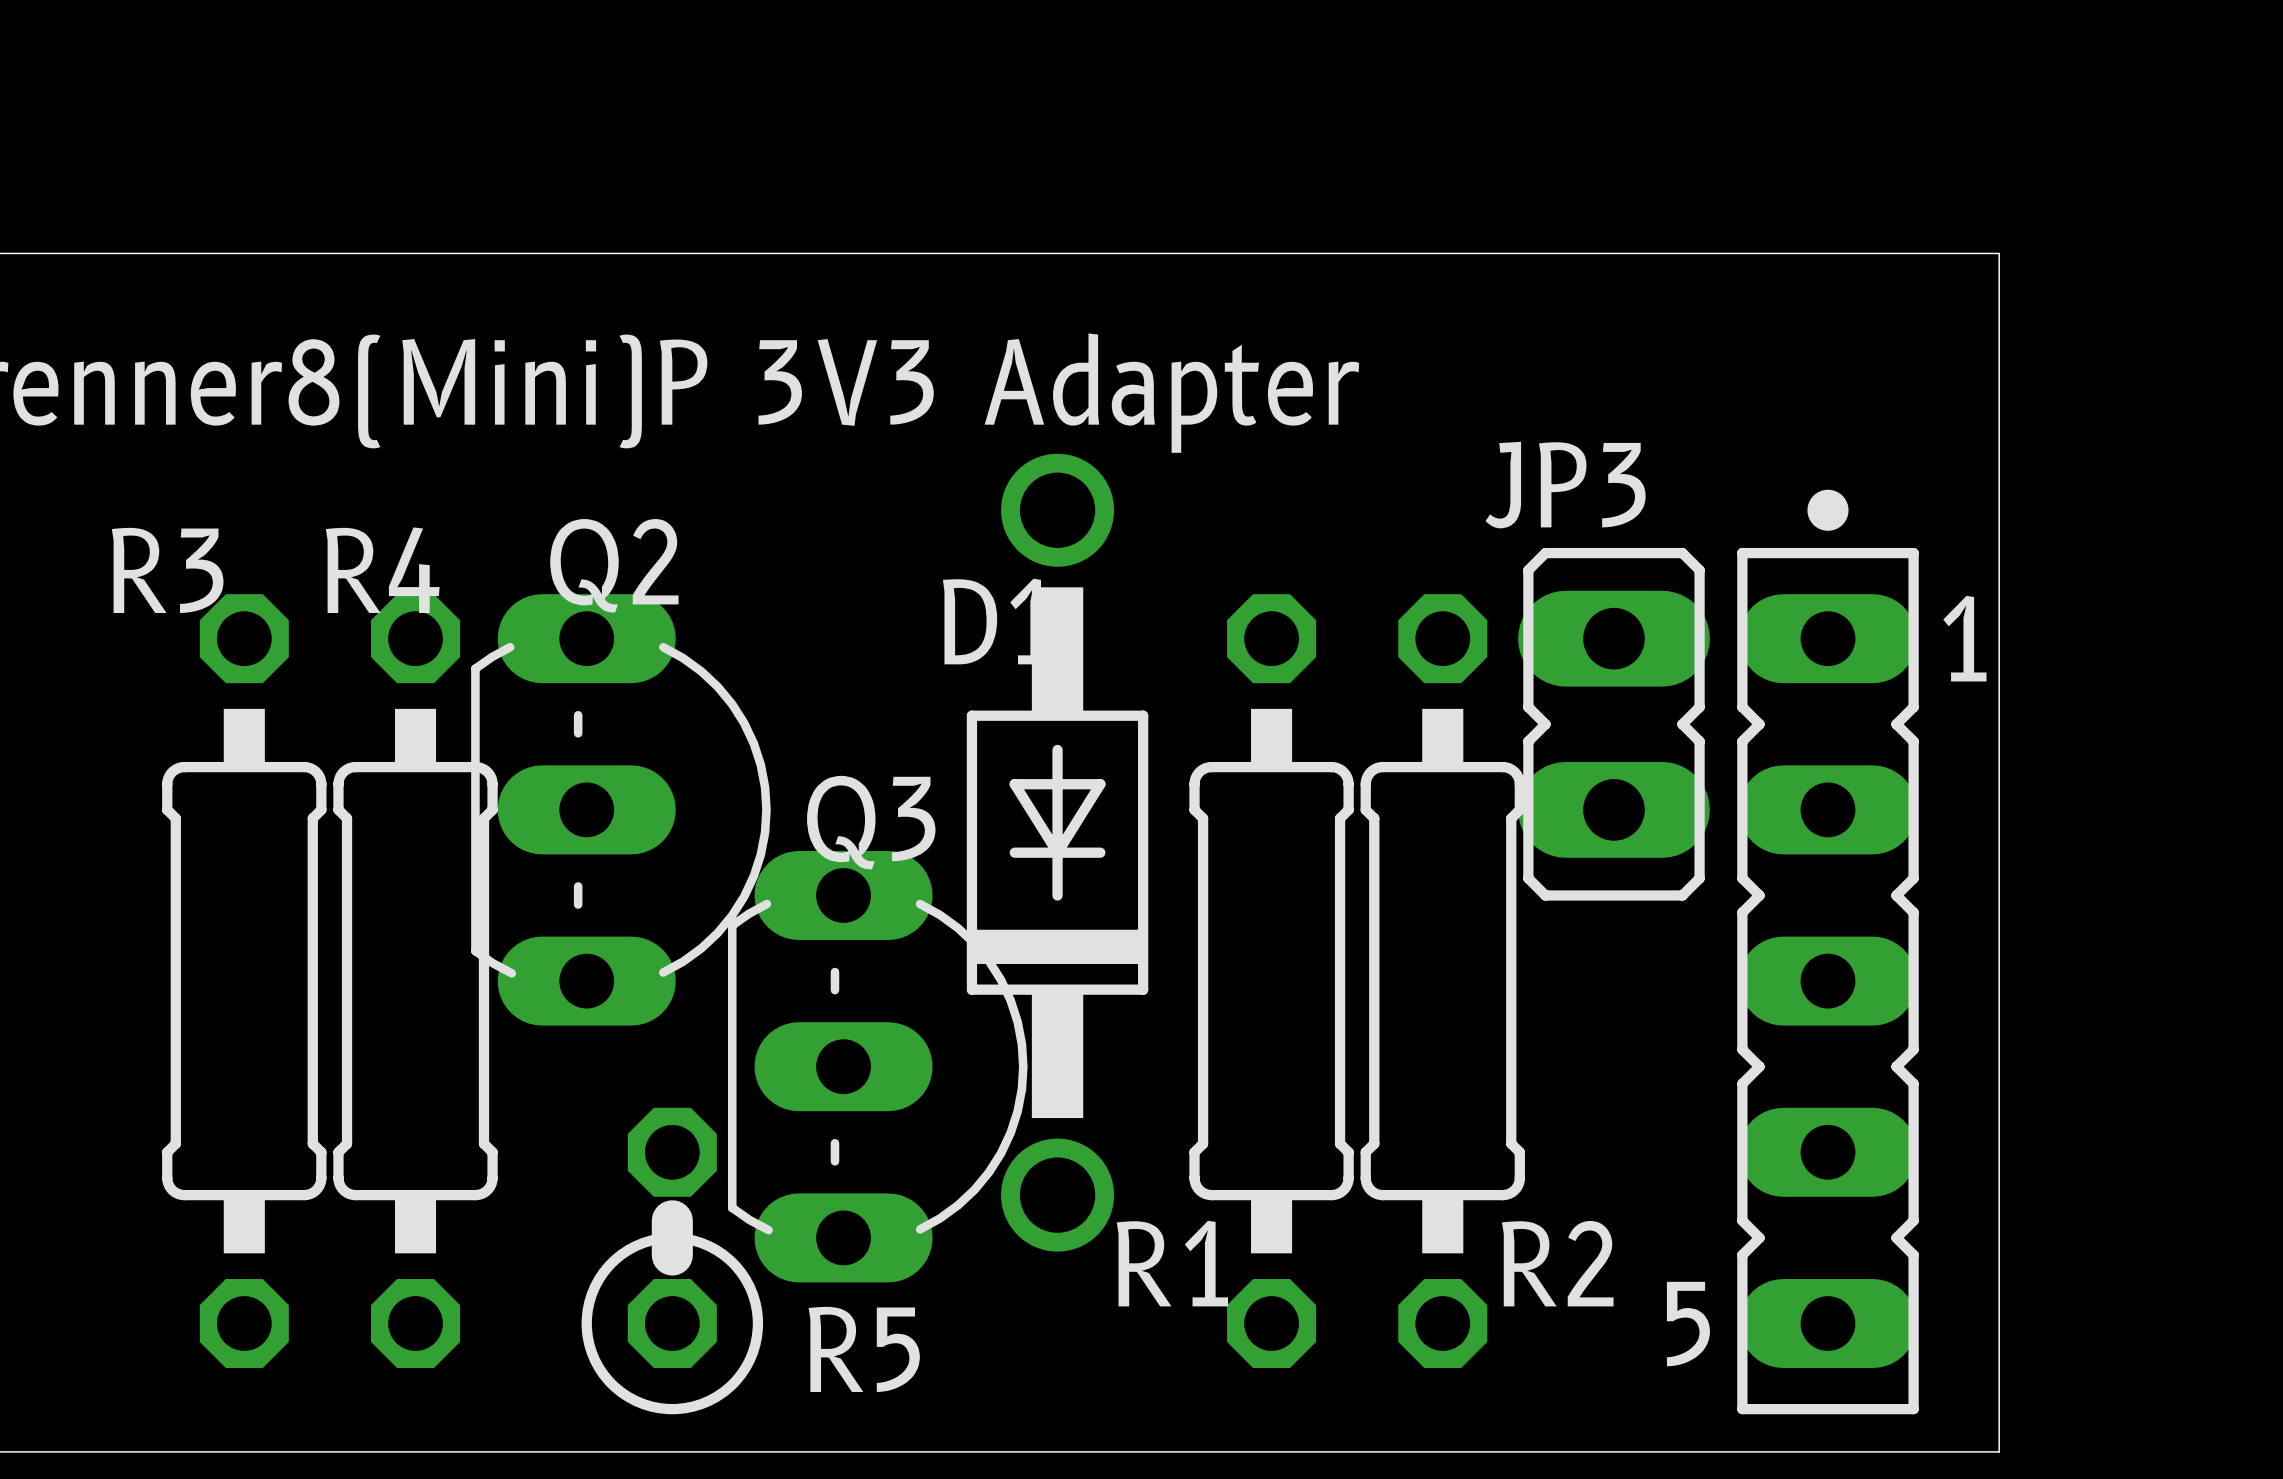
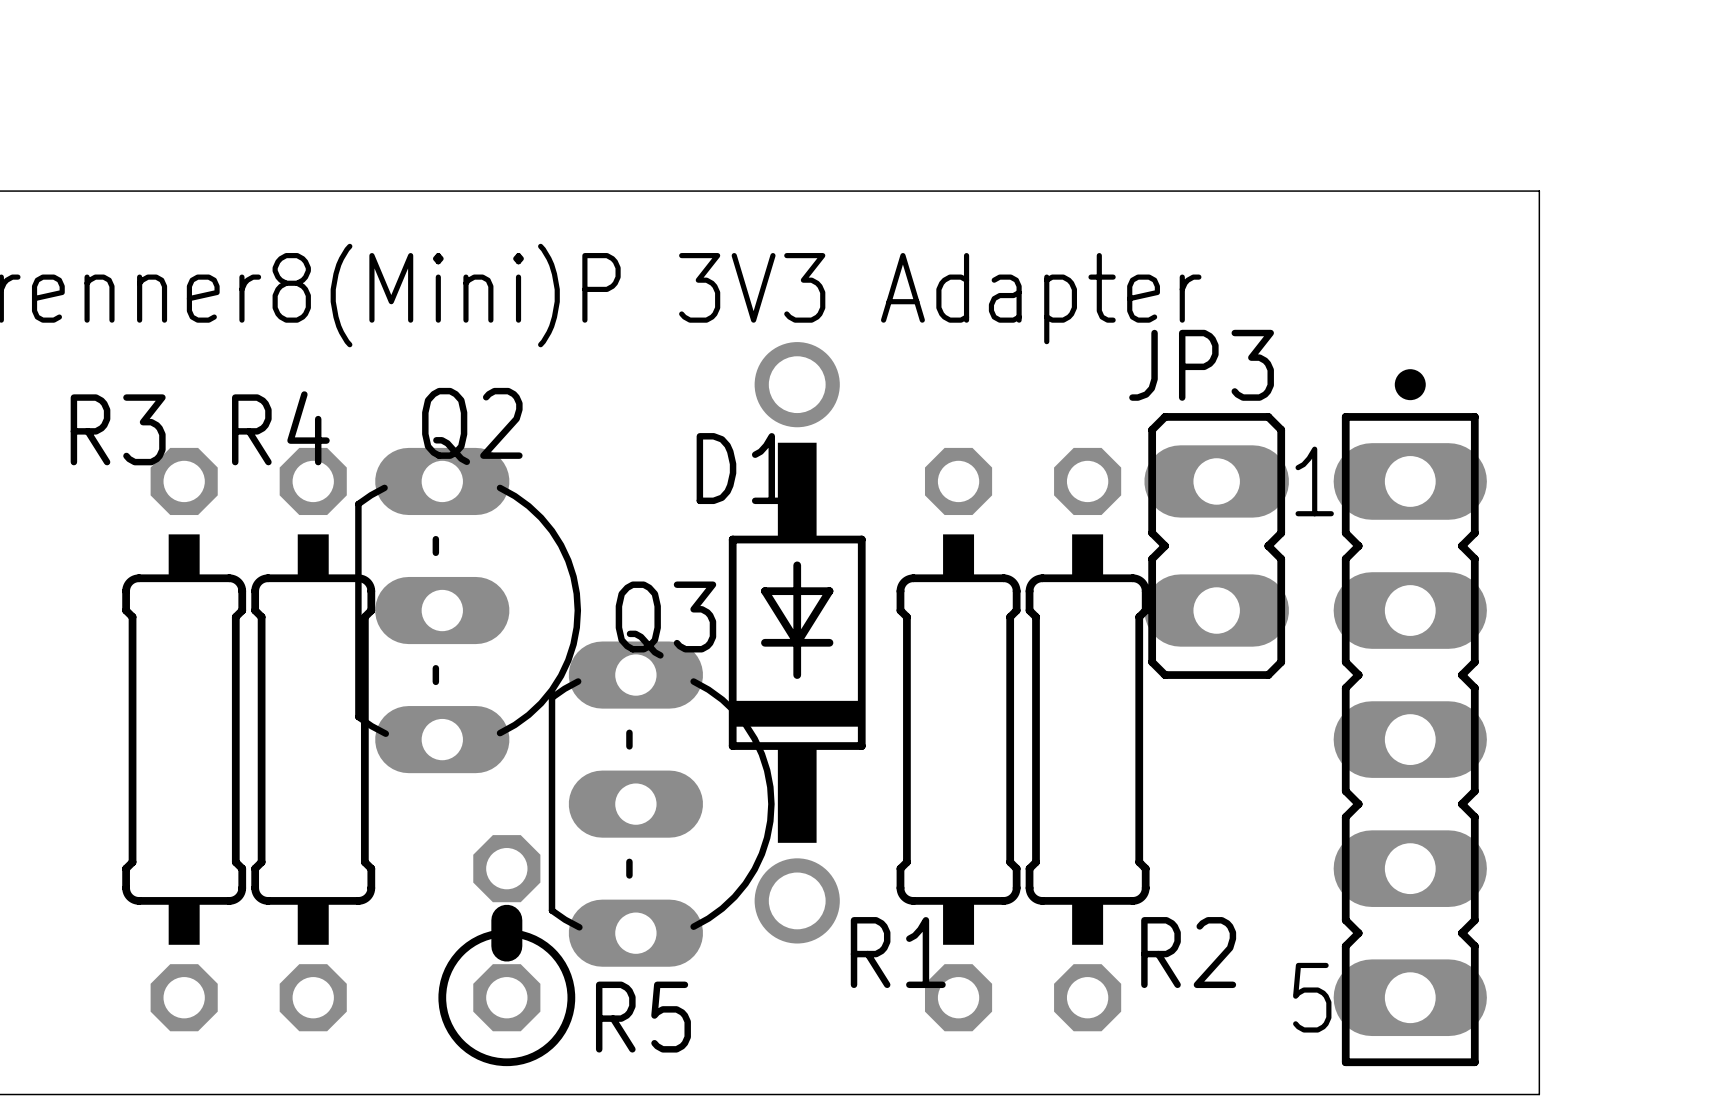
board edge: (1999, 253) (1999, 1451) -> (1507, 191) (1539, 191) (1539, 1094) (1507, 1094)
drawing position: (1827, 510) -> (1410, 384)
part footprint: [1737, 547, 1919, 1415] -> [1333, 413, 1487, 1067]
text position: 1 (1964, 638) -> 1 (1314, 481)
text position: 5 (1688, 1324) -> 5 (1312, 997)

